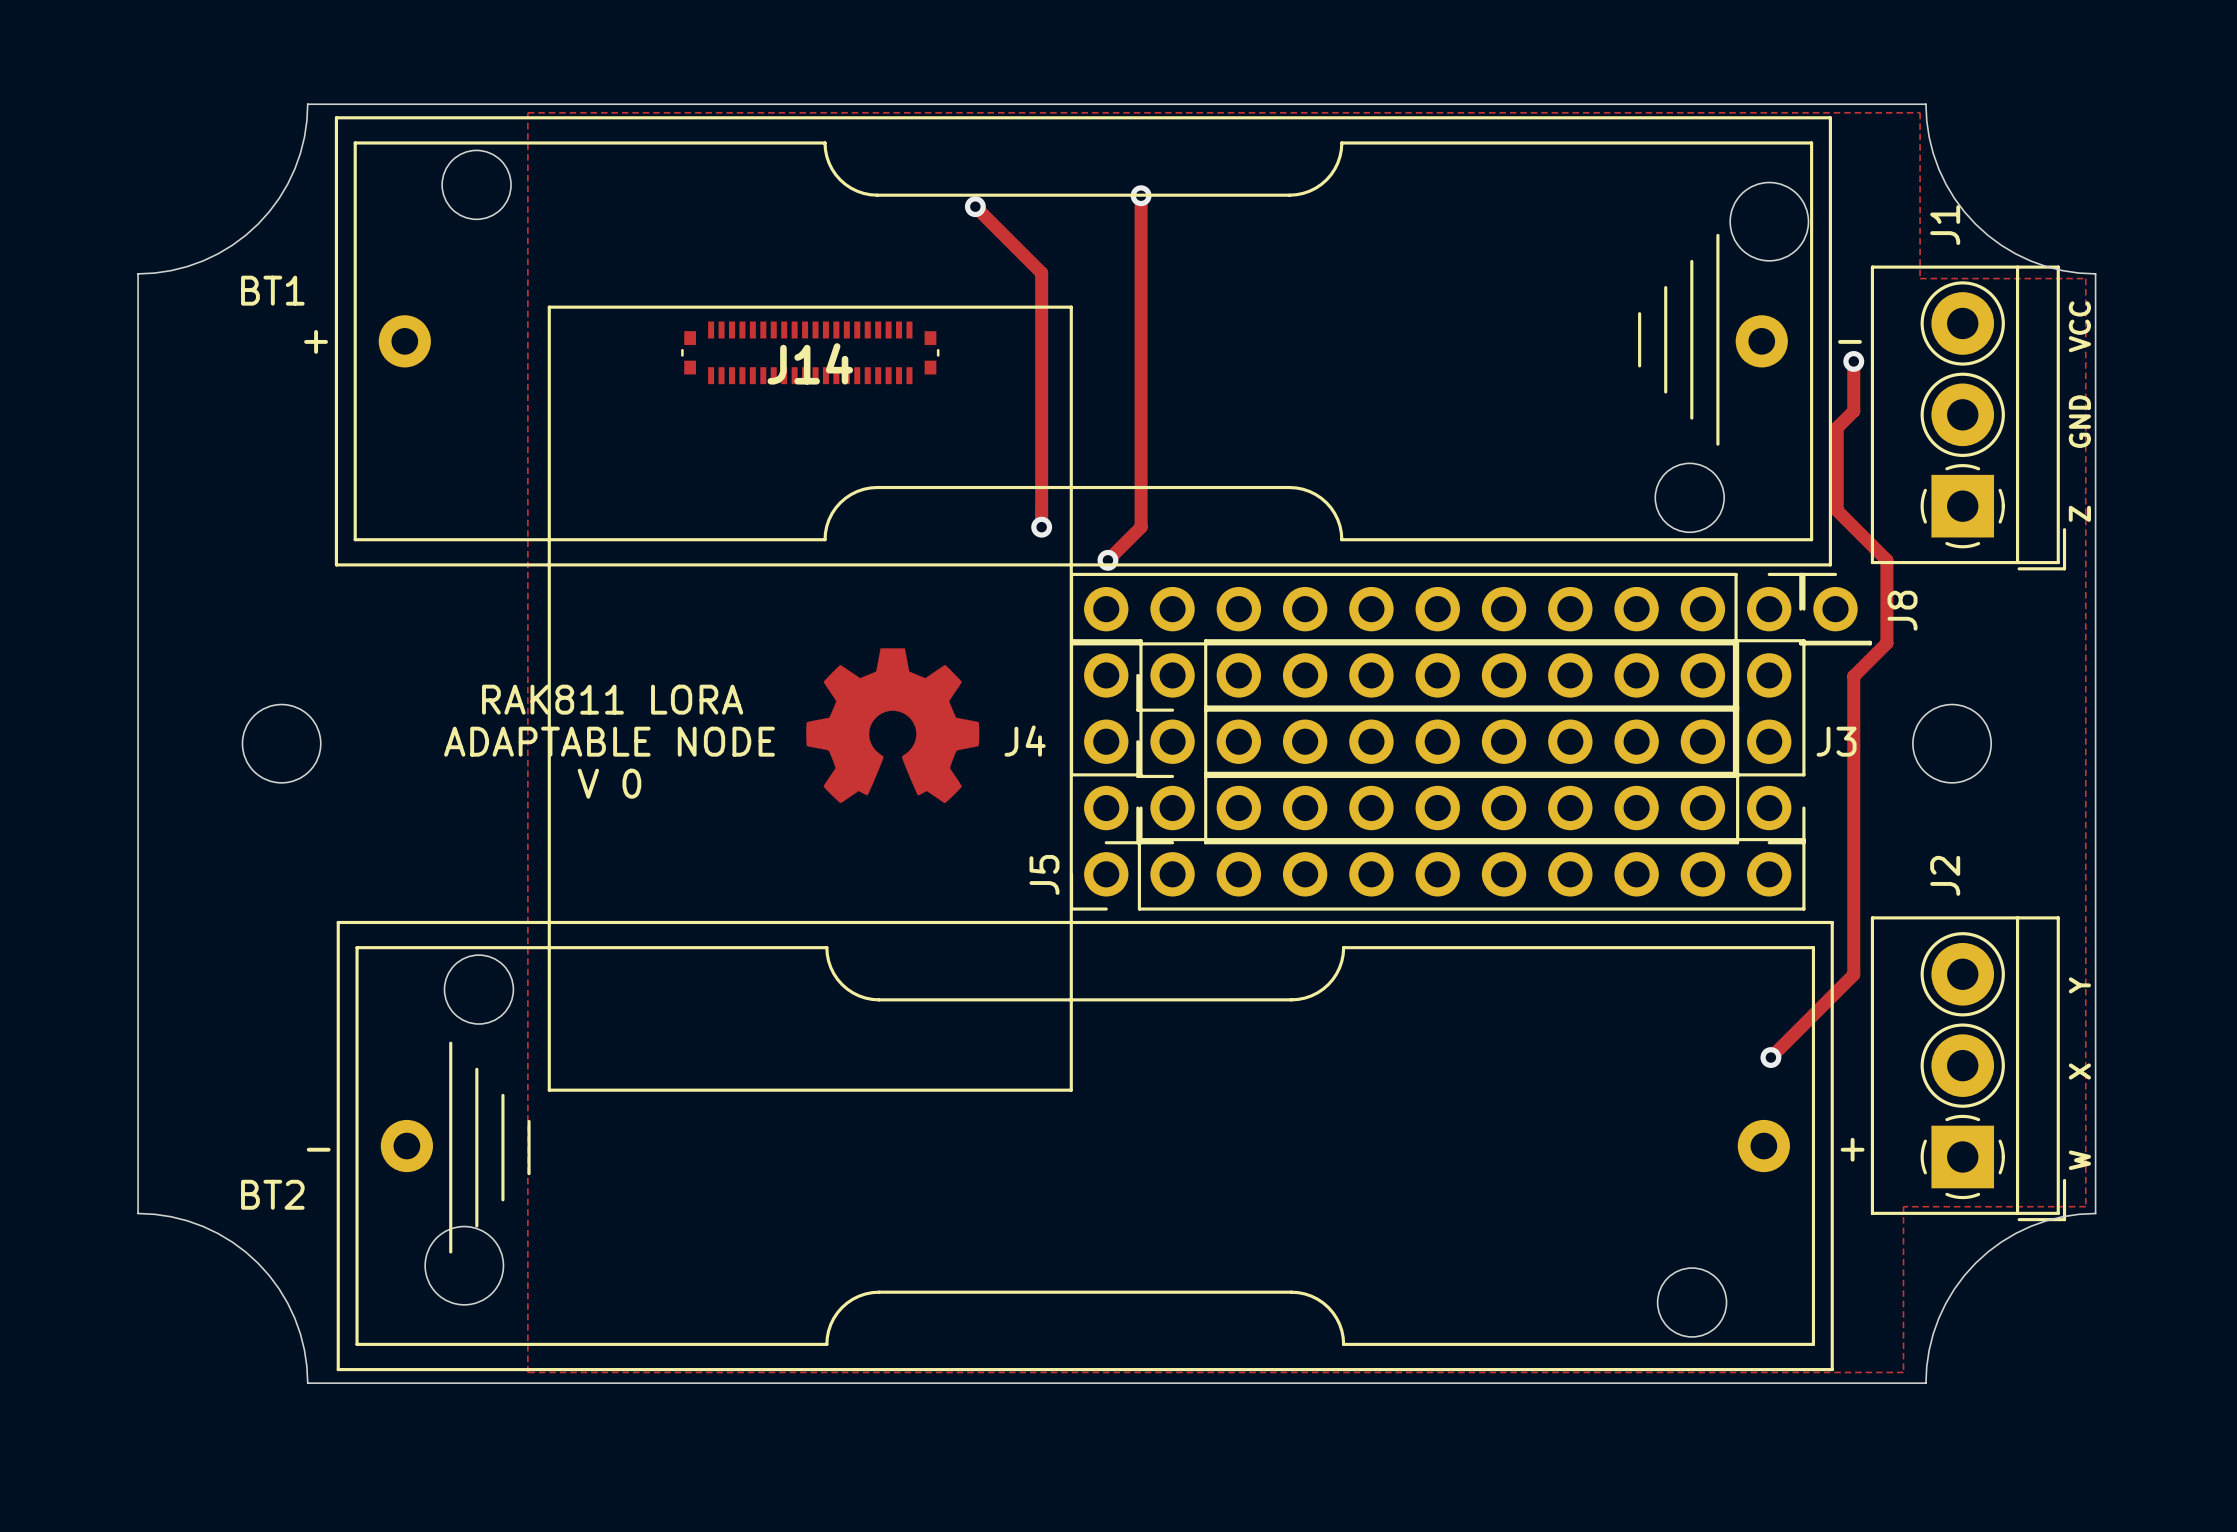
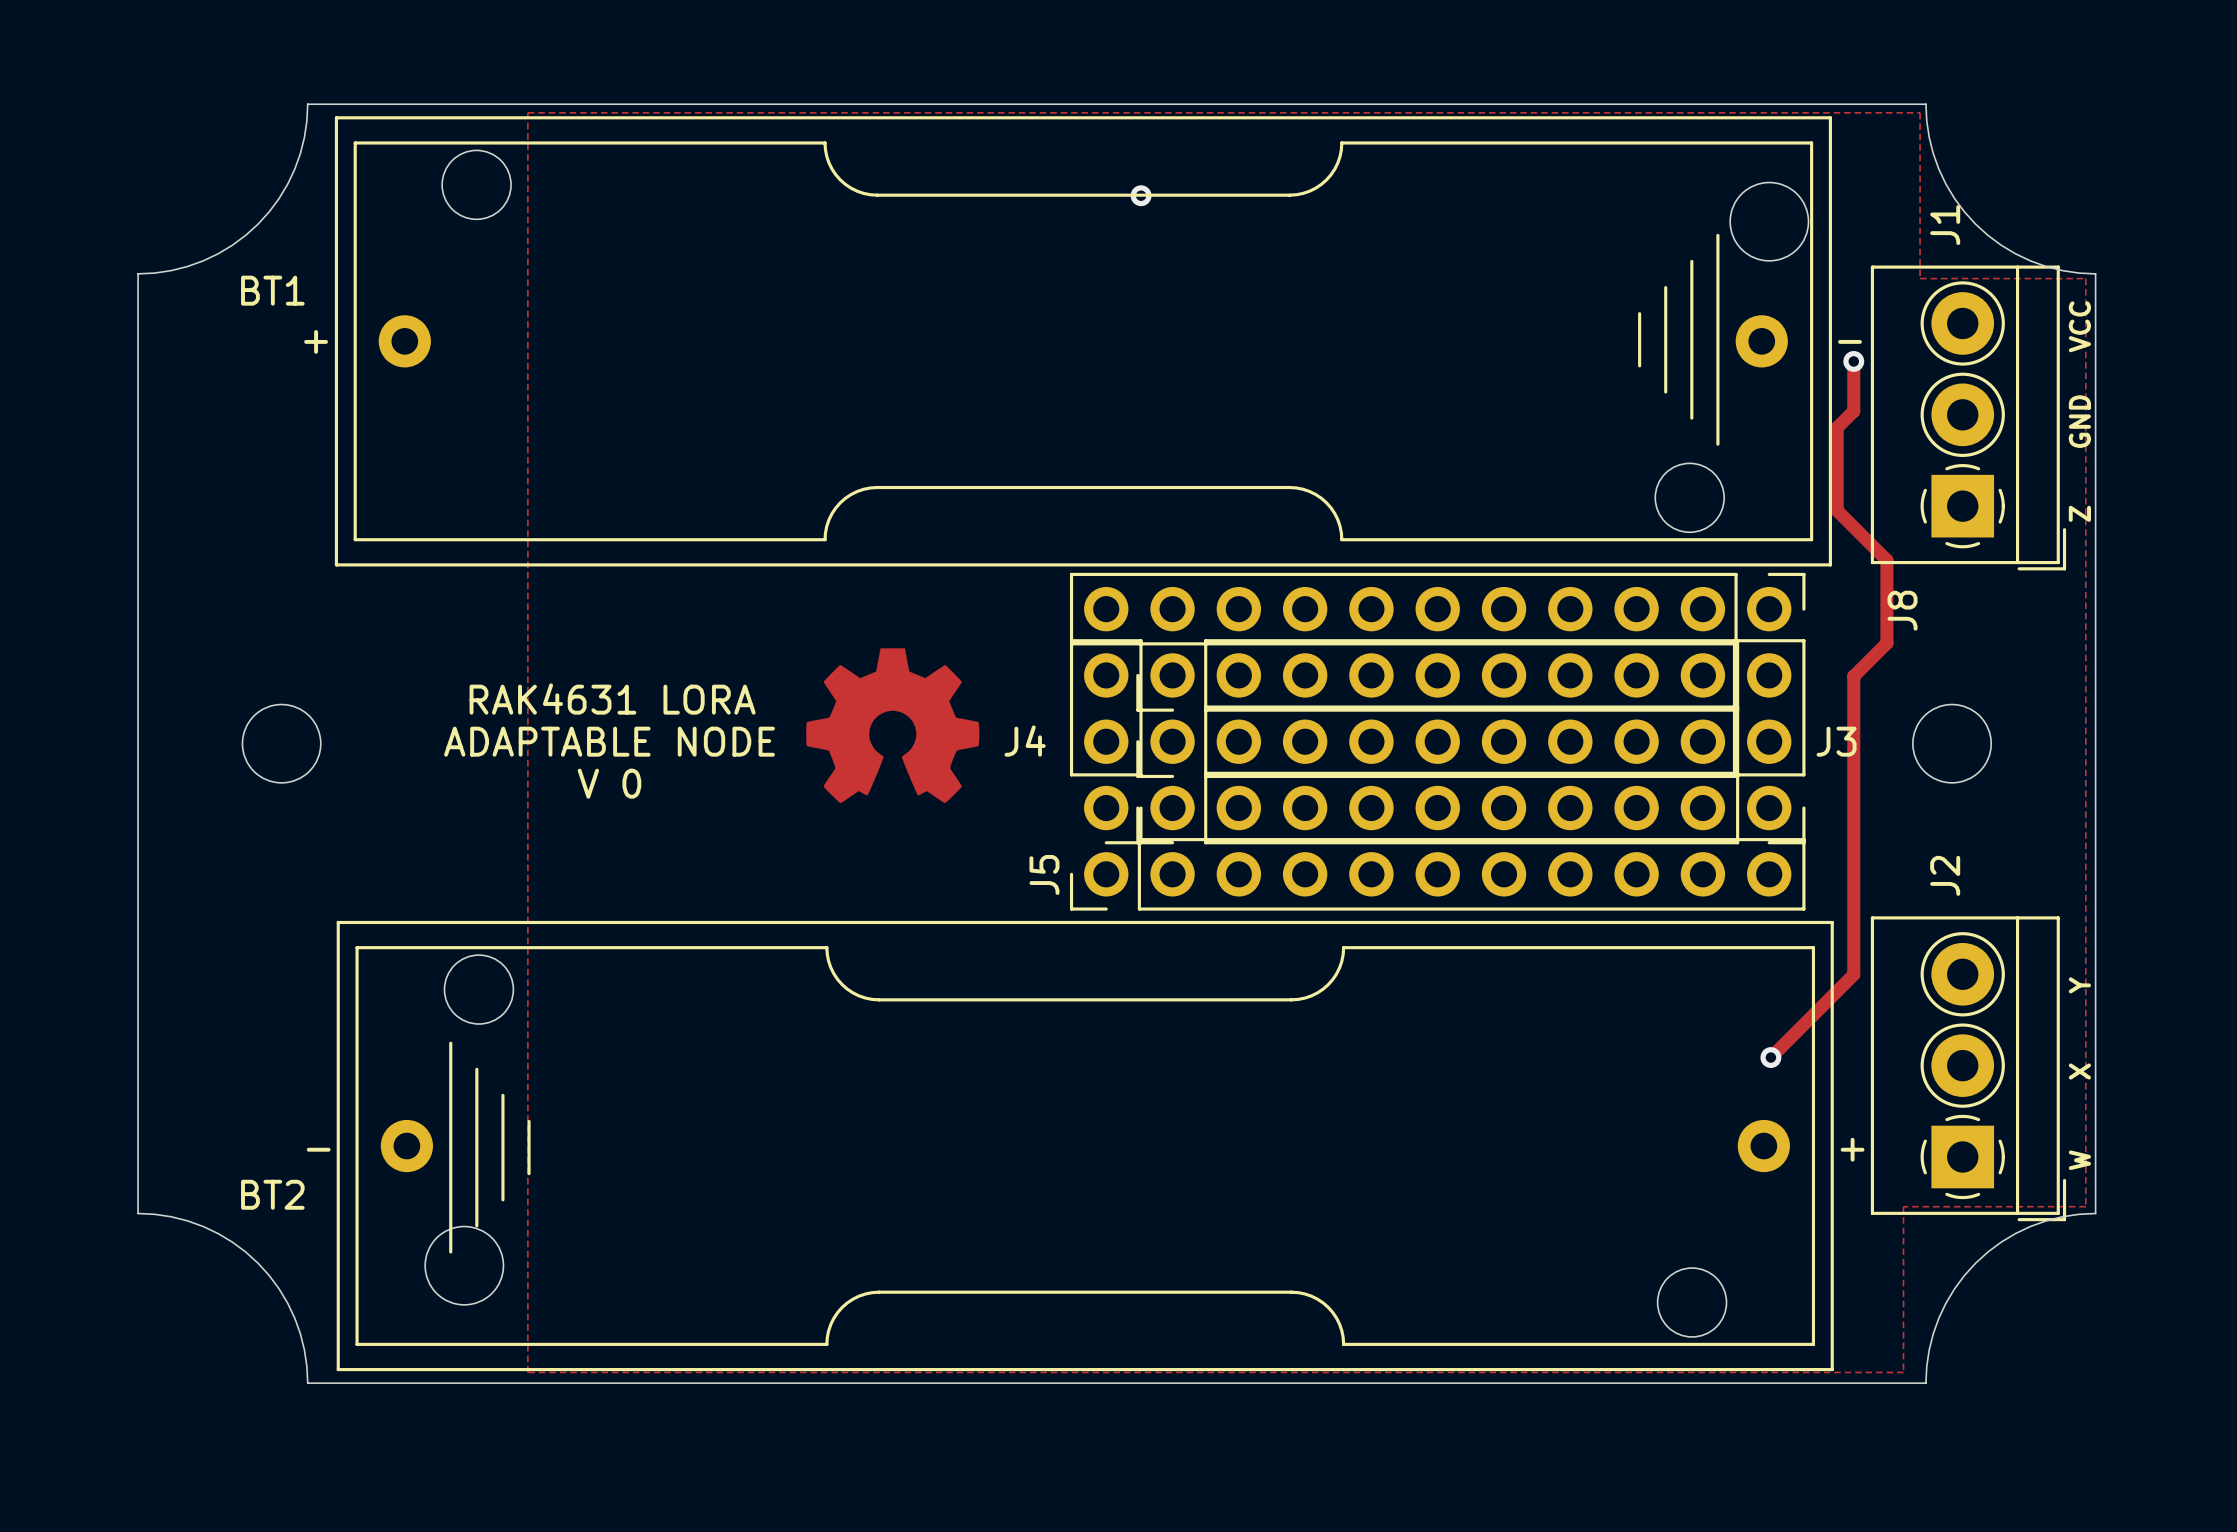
track: (1141, 195) (1141, 527) (1107, 560) -> none
track: (975, 206) (1041, 272) (1041, 527) -> none
via: (975, 206) -> none
via: (1041, 527) -> none
via: (1107, 560) -> none
part: (1835, 609) -> none
J14: (810, 698) -> none
text: RAK811 LORA (612, 699) -> RAK4631 LORA (612, 699)

